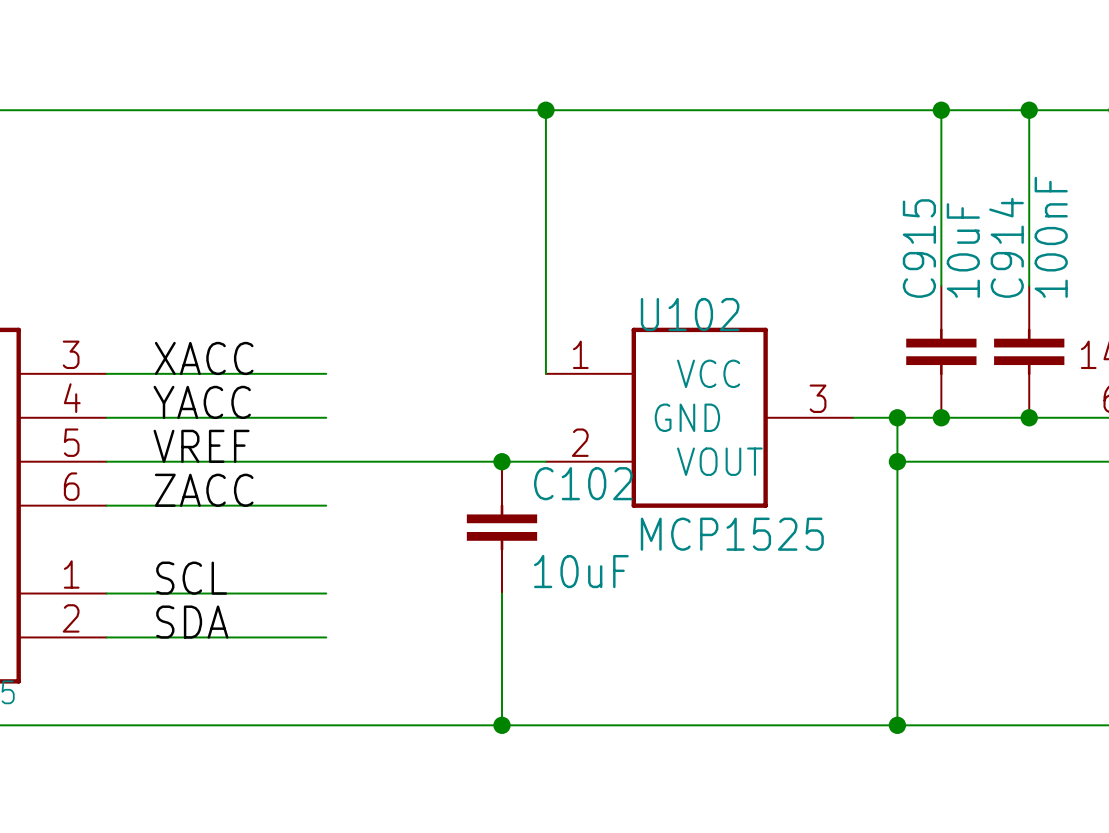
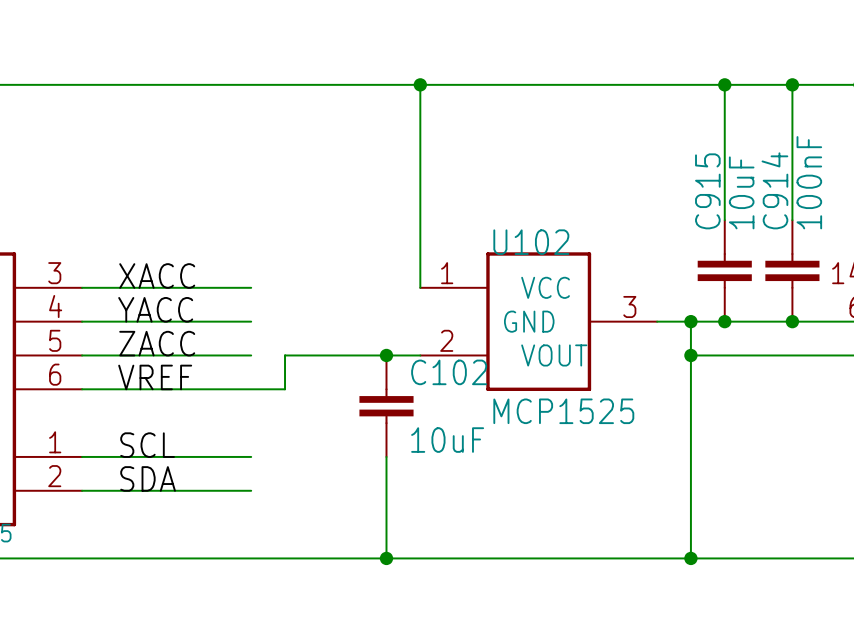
label: VREF (201, 446) -> ZACC (157, 343)
wire: (326, 461) (370, 461) -> (251, 389) (285, 389) (285, 355)
label: ZACC (204, 490) -> VREF (155, 377)

